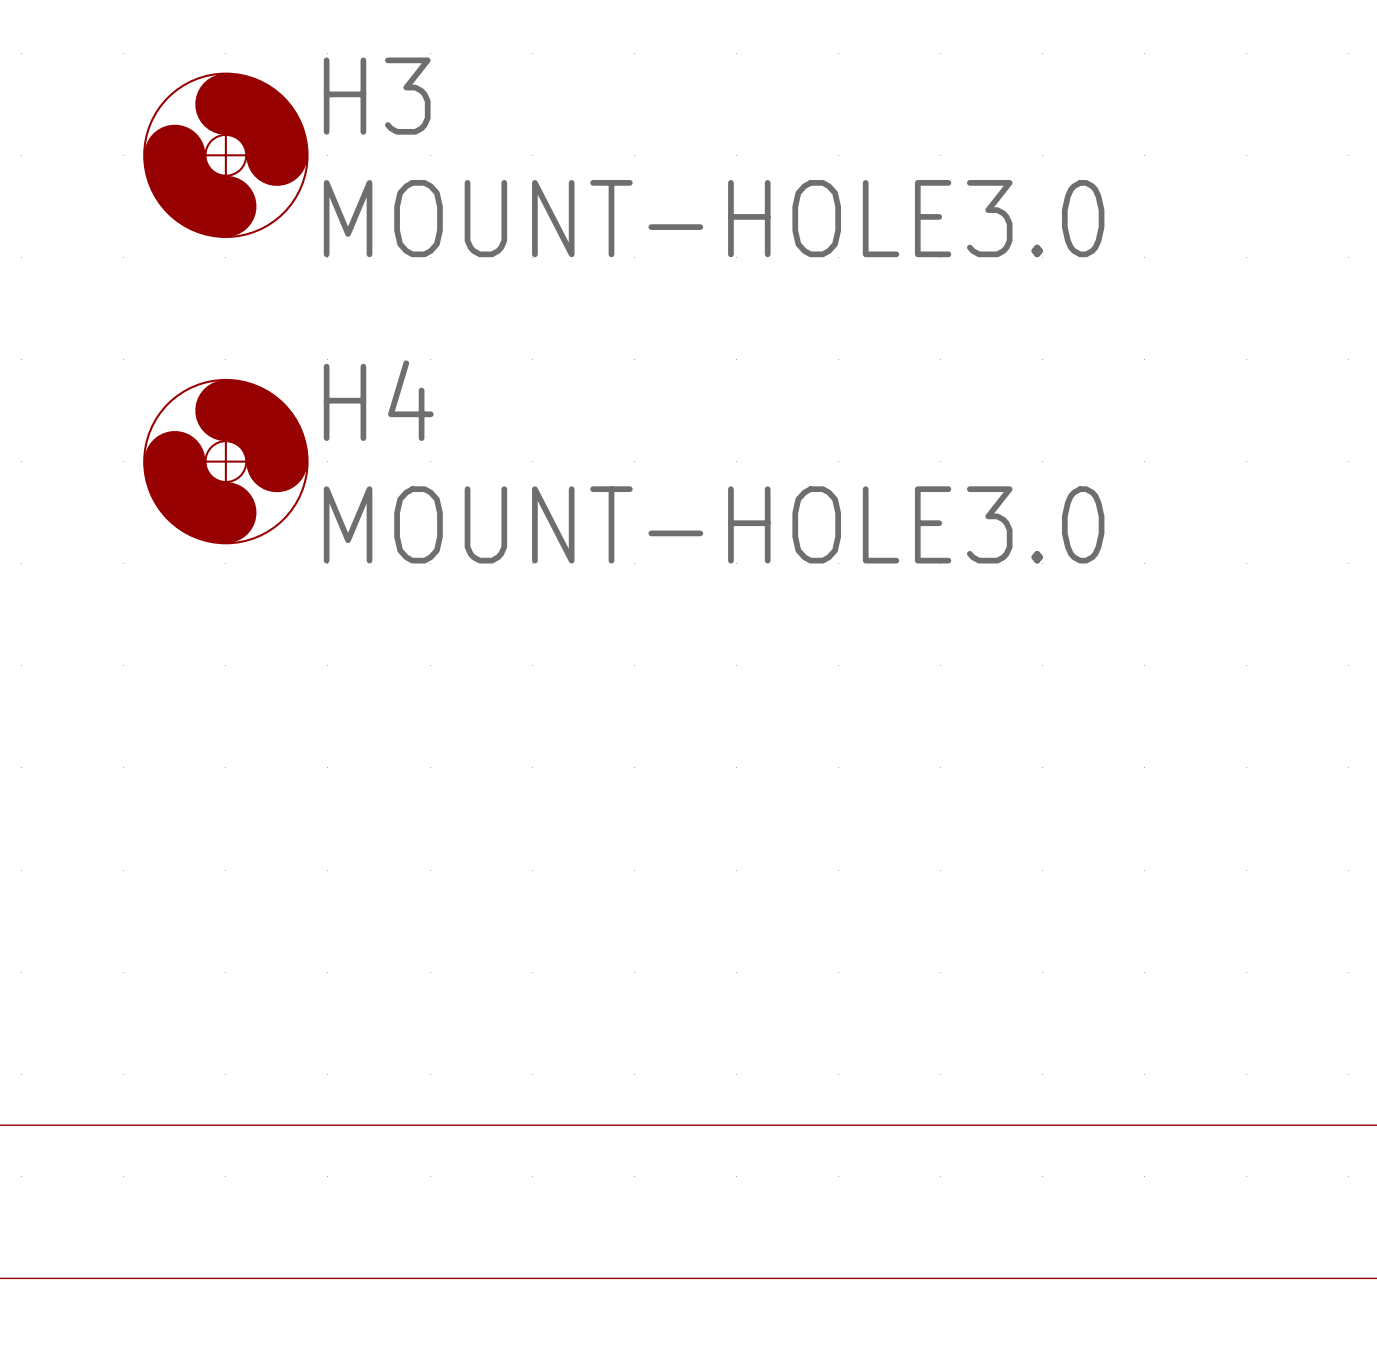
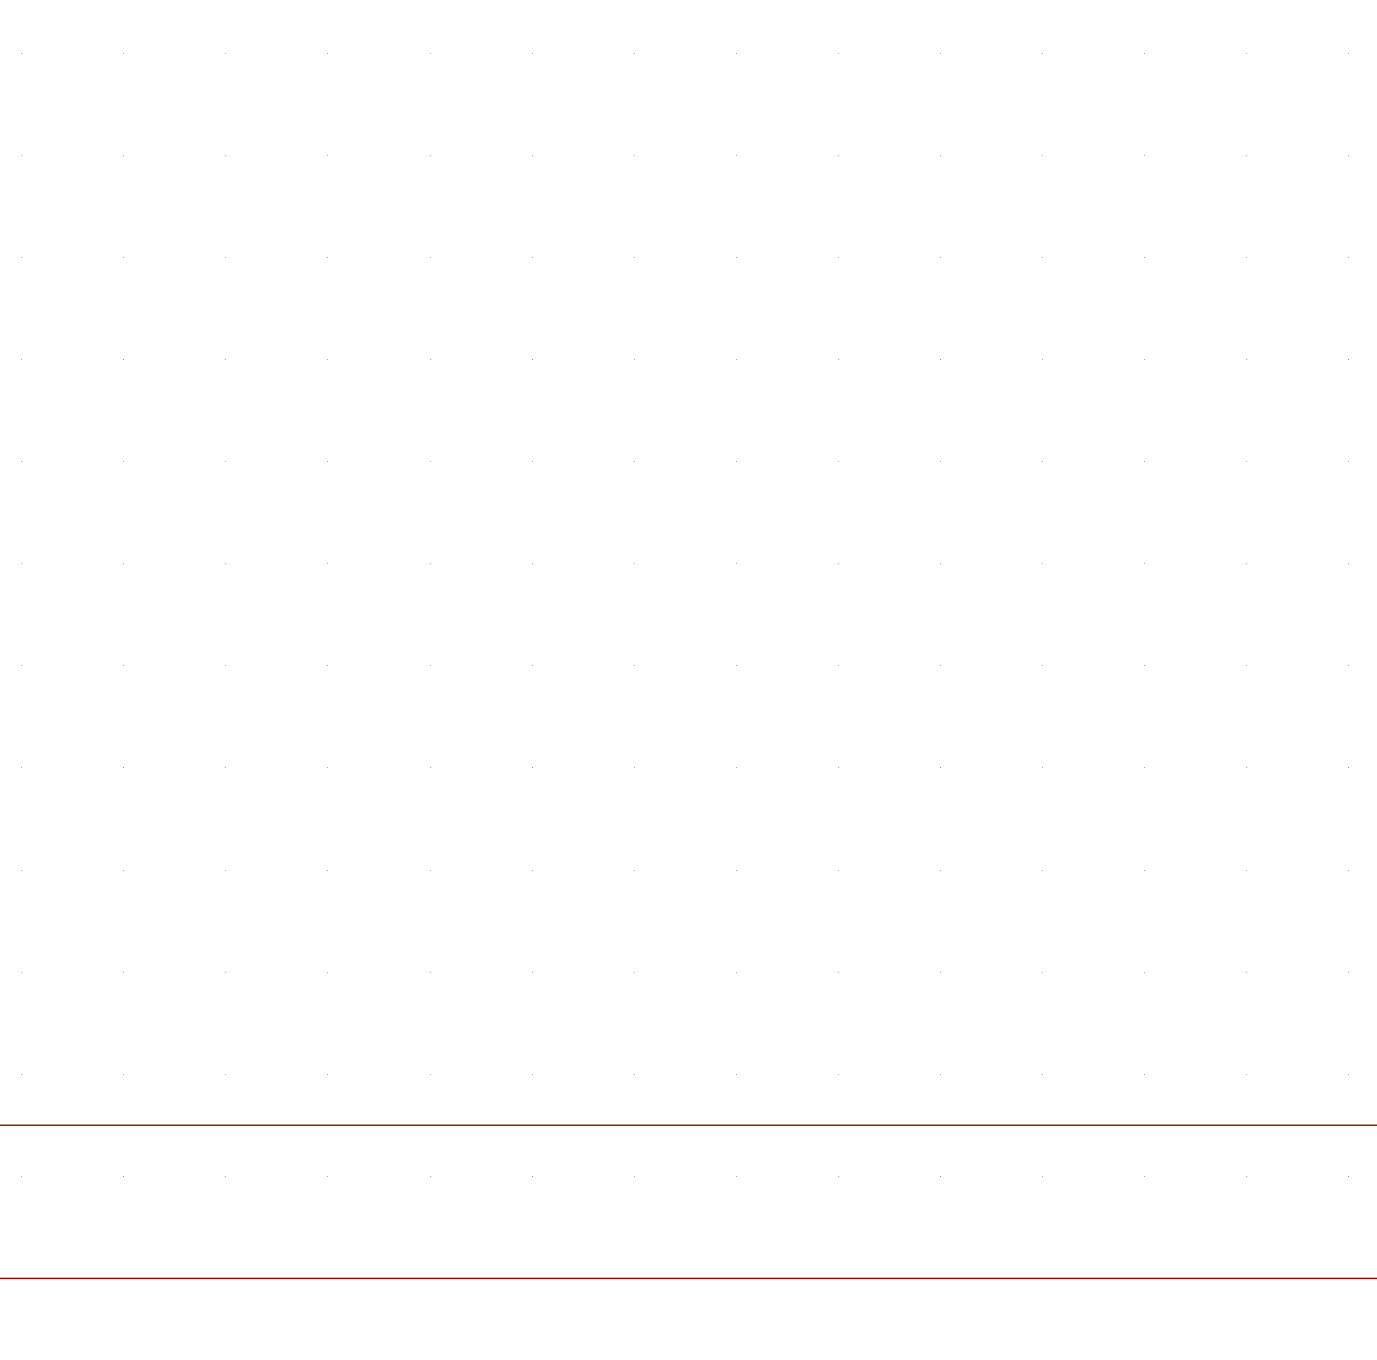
H3: MOUNT-HOLE3.0 (225, 155) -> none
H4: MOUNT-HOLE3.0 (225, 461) -> none

